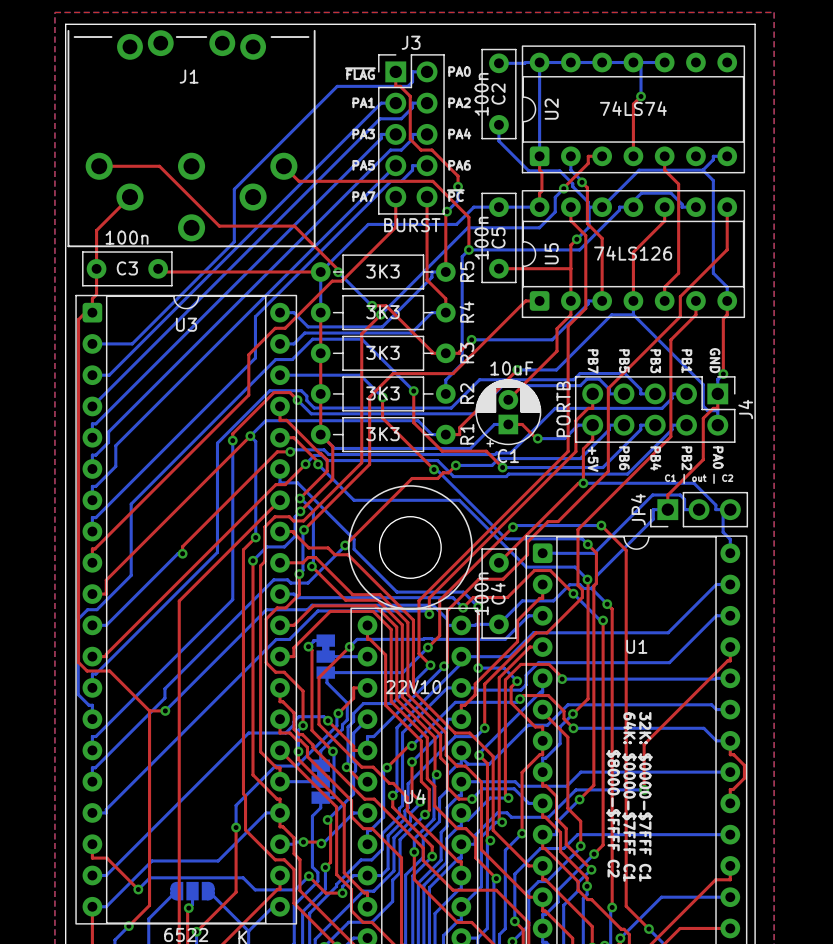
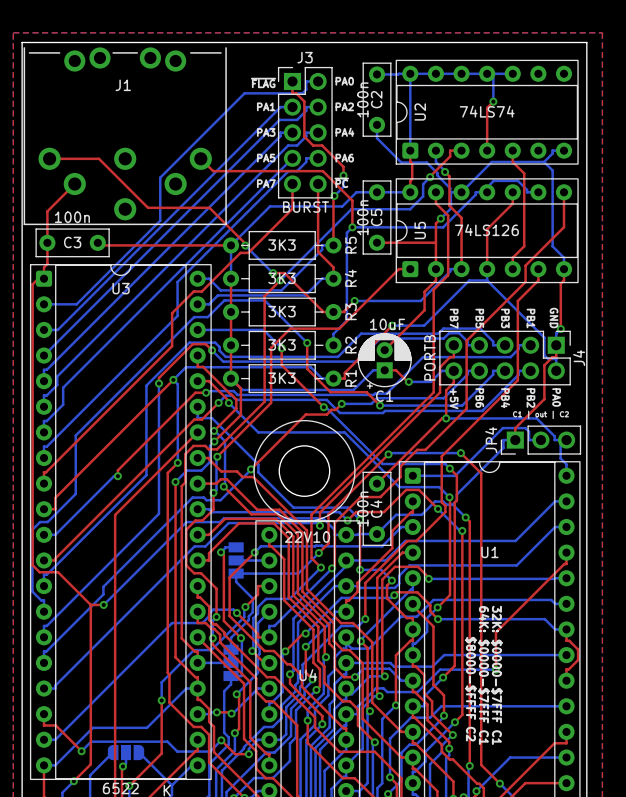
part footprint: [316, 634, 335, 679] -> [228, 542, 244, 579]
U4 value position: 22V10 (413, 687) -> 22V10 (307, 537)

